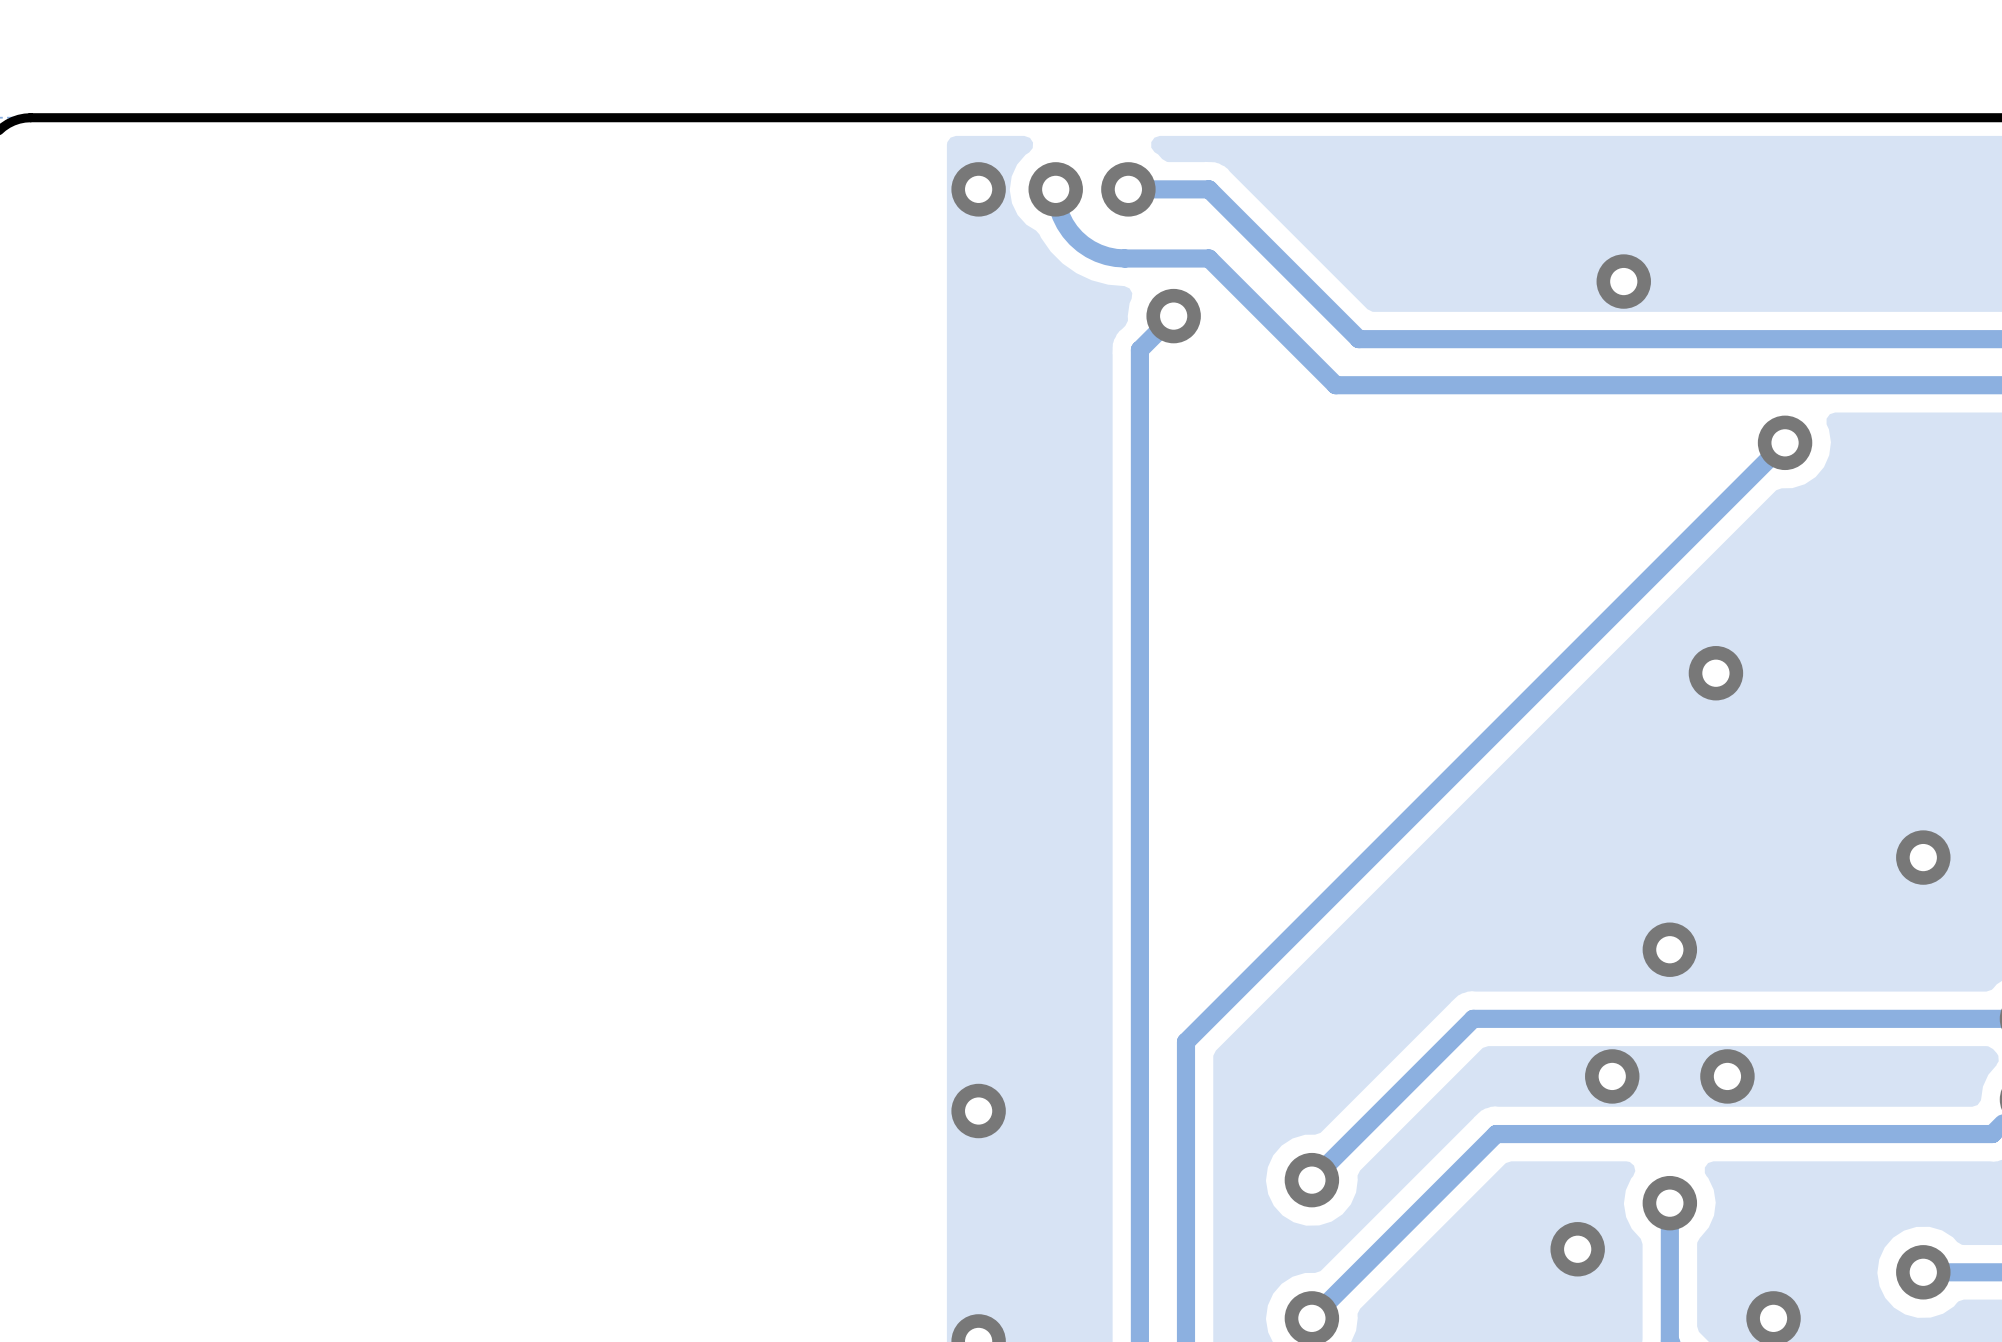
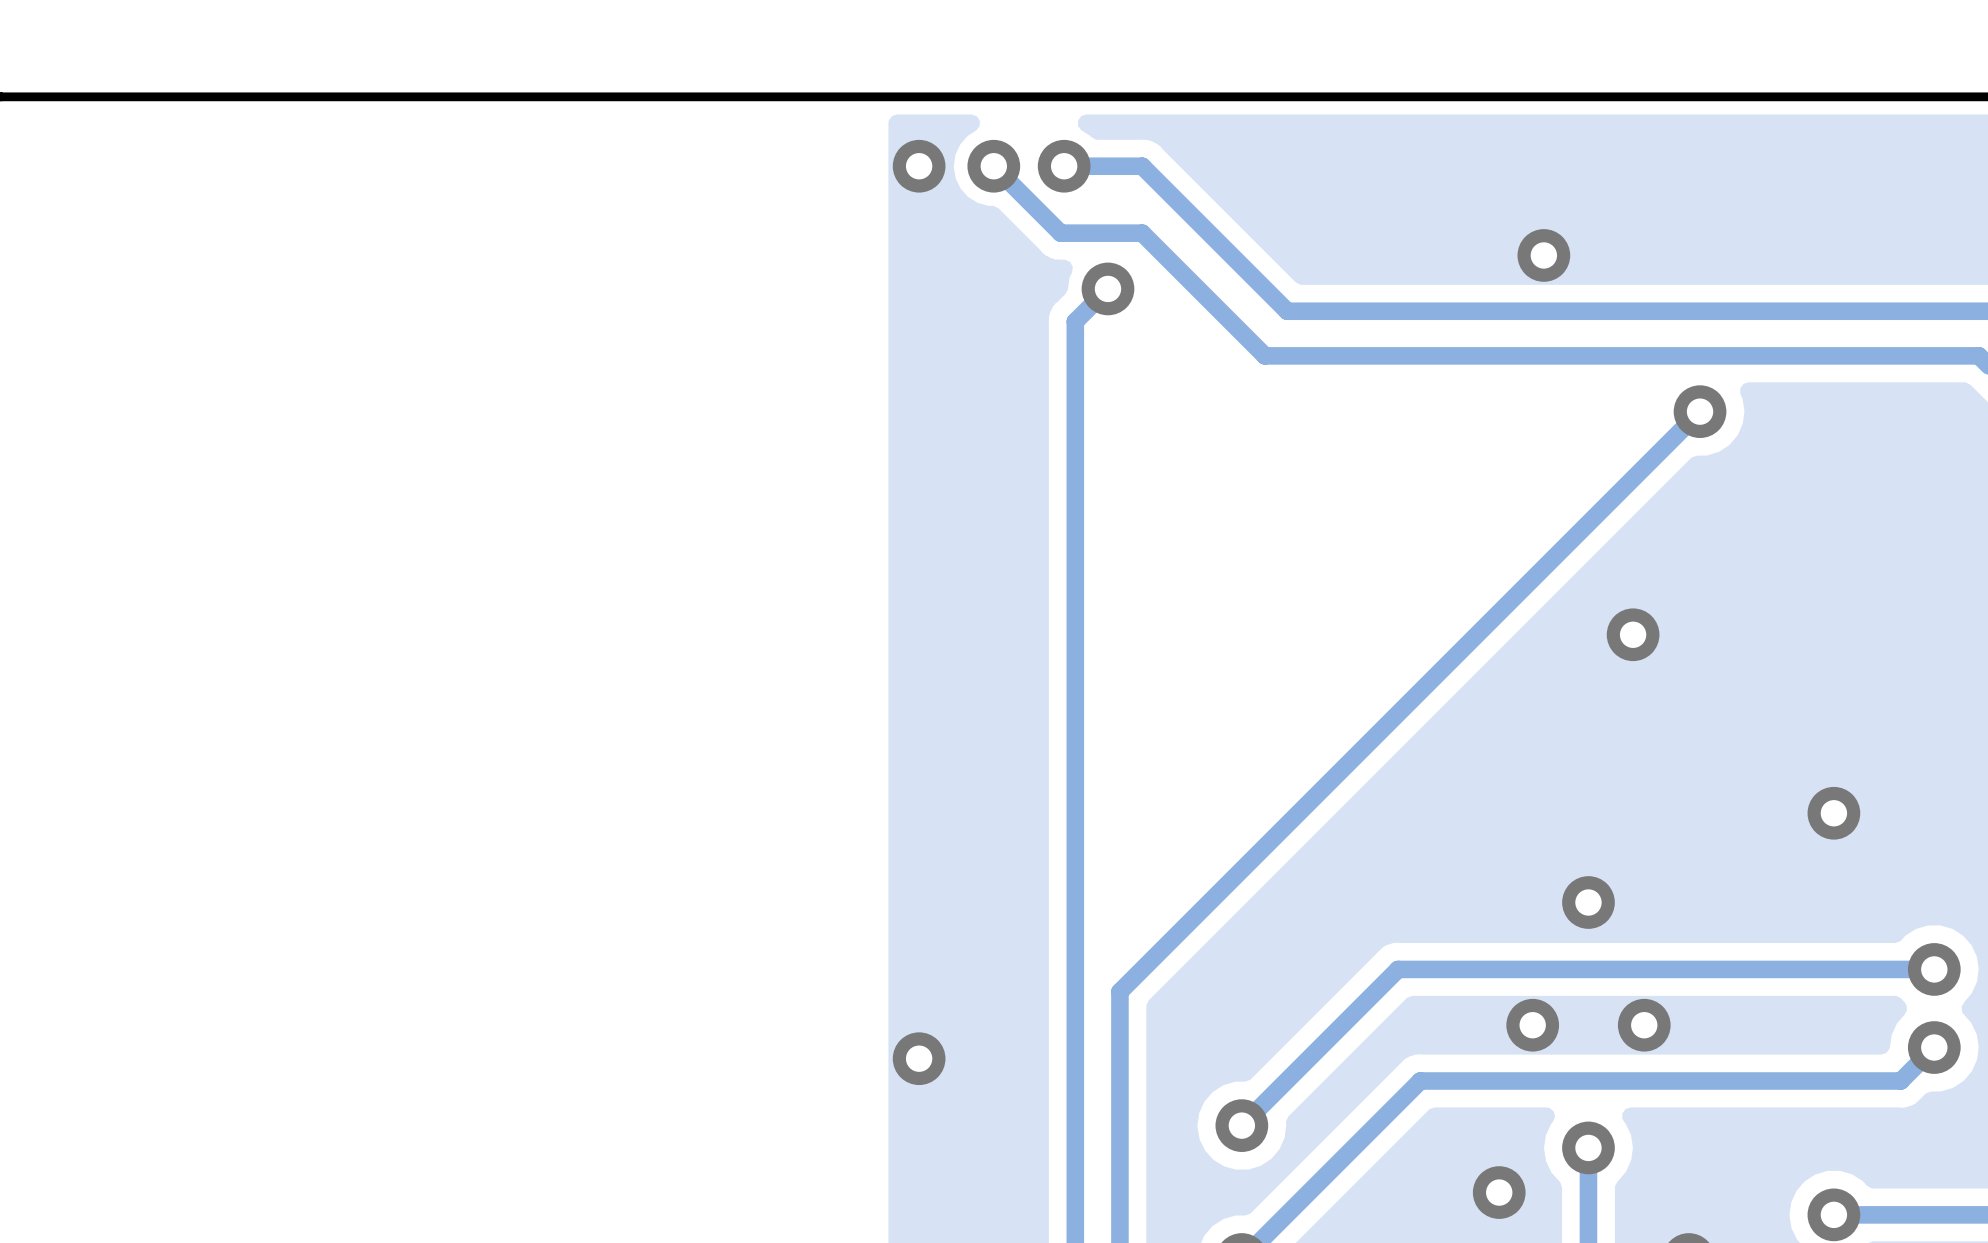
track: (1055, 189) (1060, 215) (1075, 238) (1098, 253) (1124, 258) -> (993, 166) (1060, 233)

